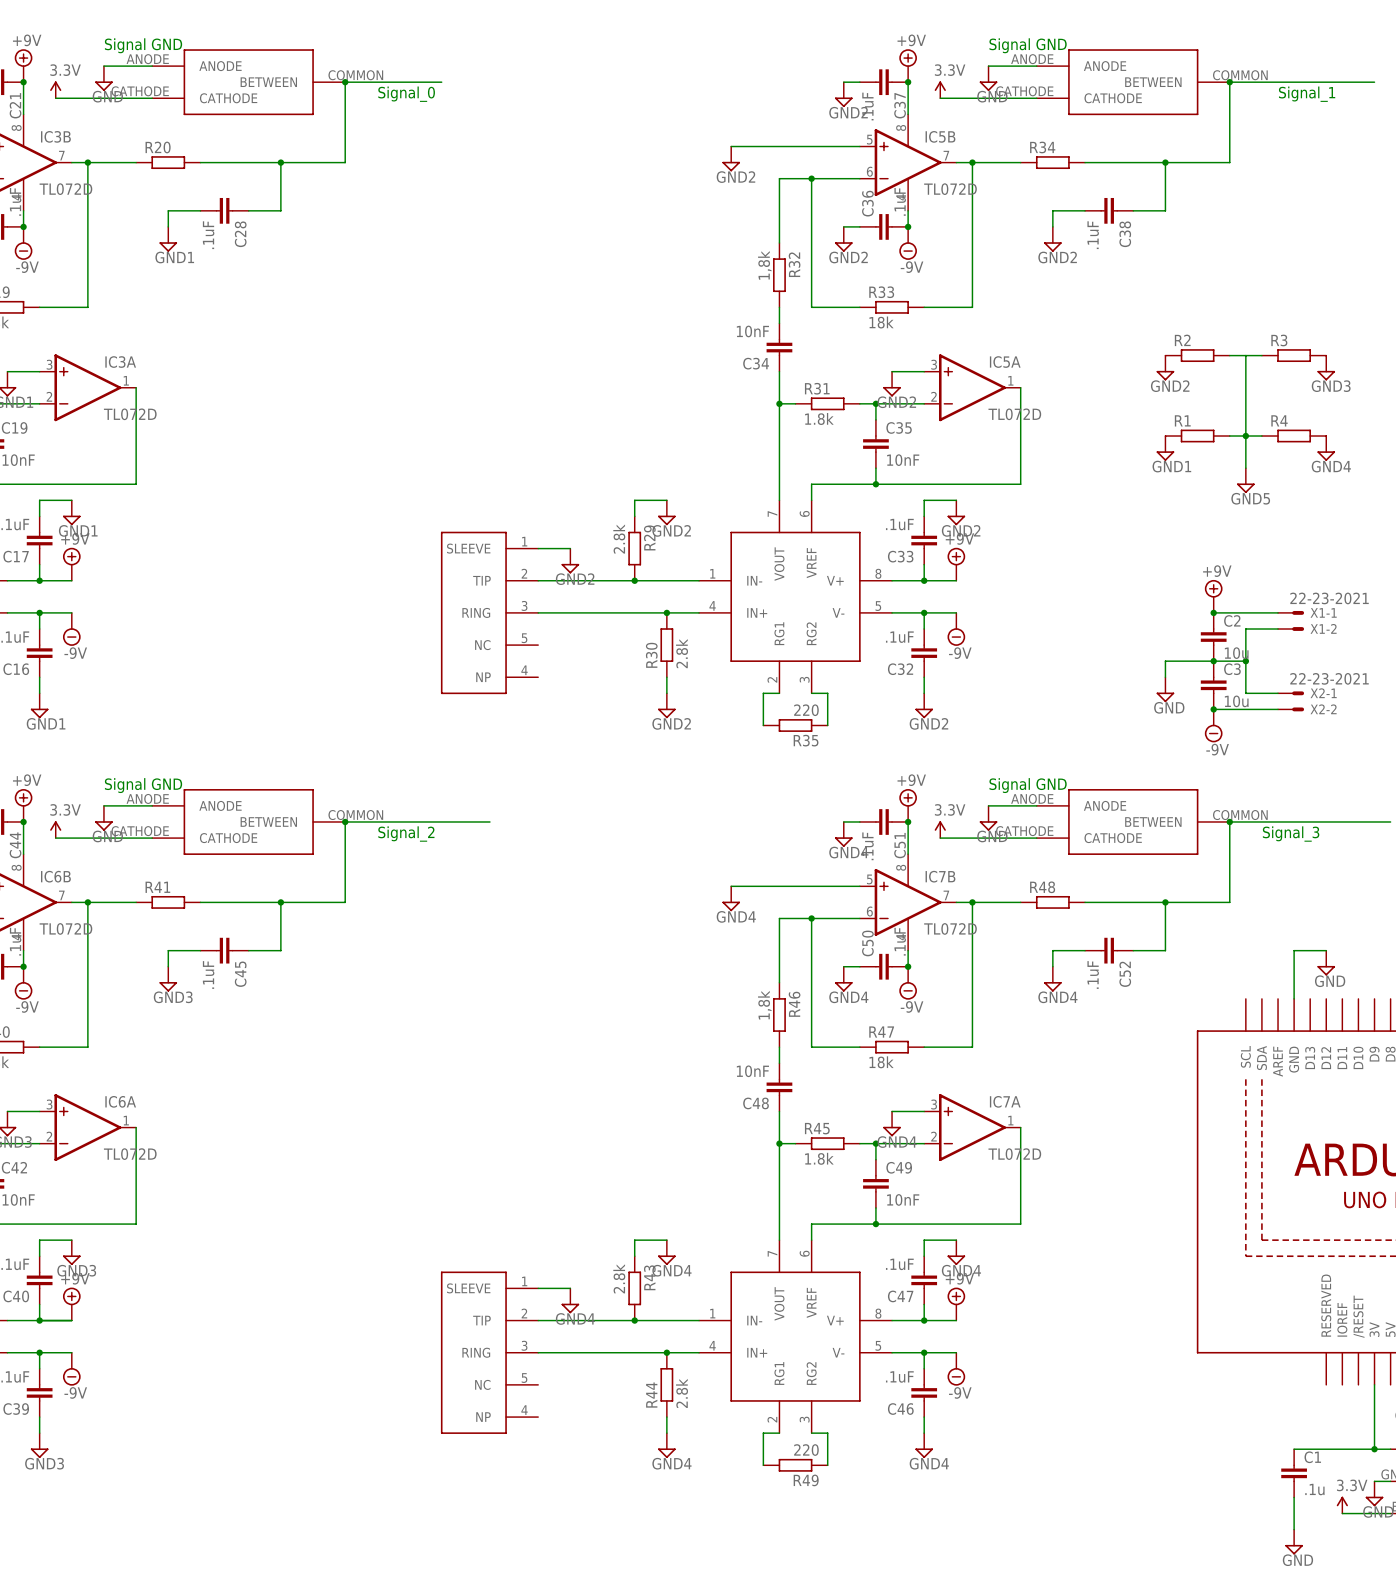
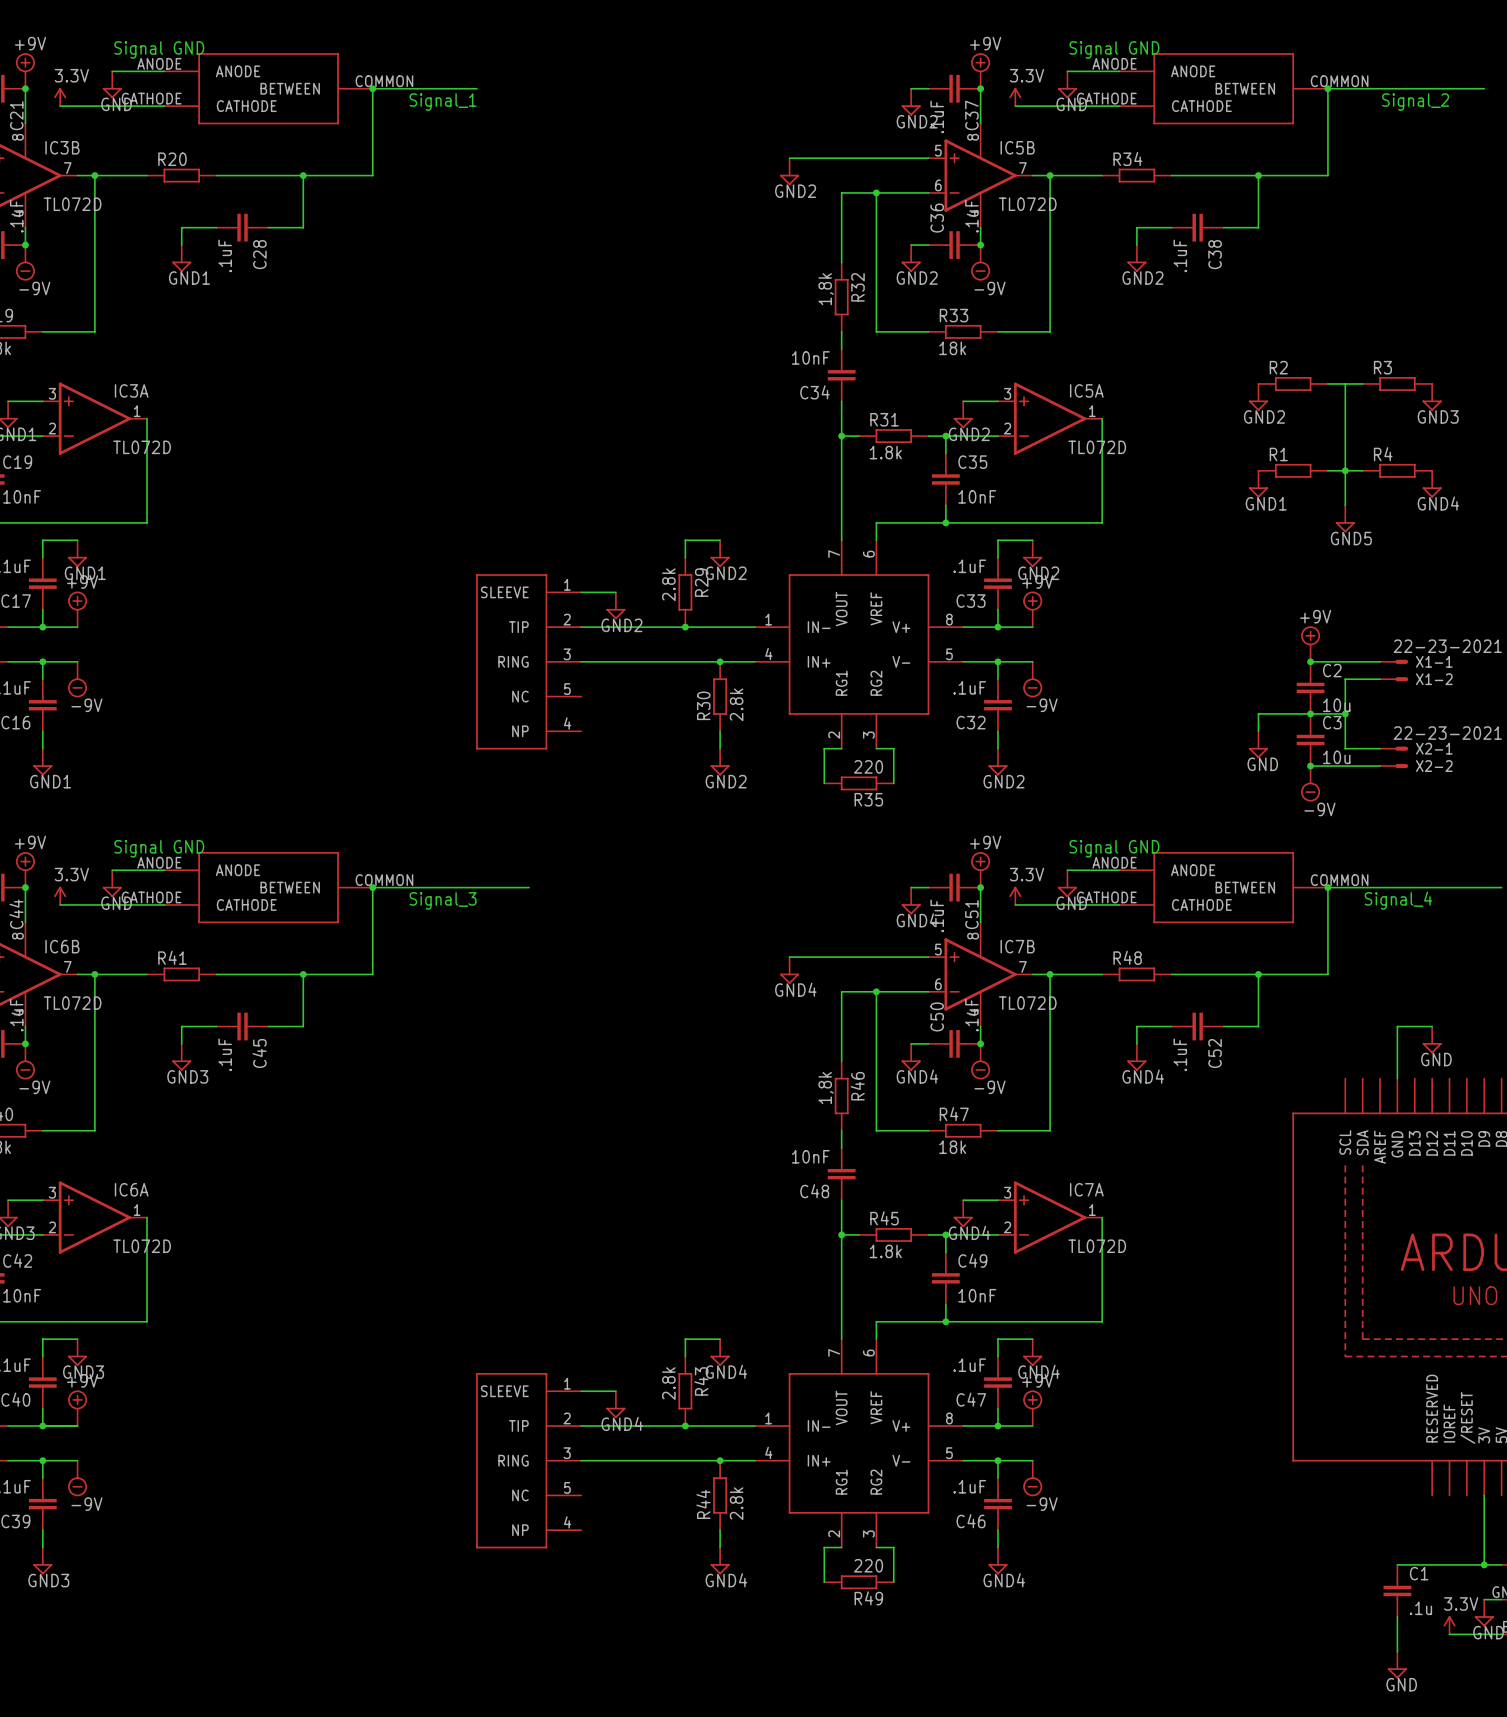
text: Signal_0 (406, 94) -> Signal_1 (443, 102)
text: Signal_1 (1307, 94) -> Signal_2 (1415, 102)
text: Signal_2 (406, 834) -> Signal_3 (443, 900)
text: Signal_3 (1291, 834) -> Signal_4 (1398, 900)

